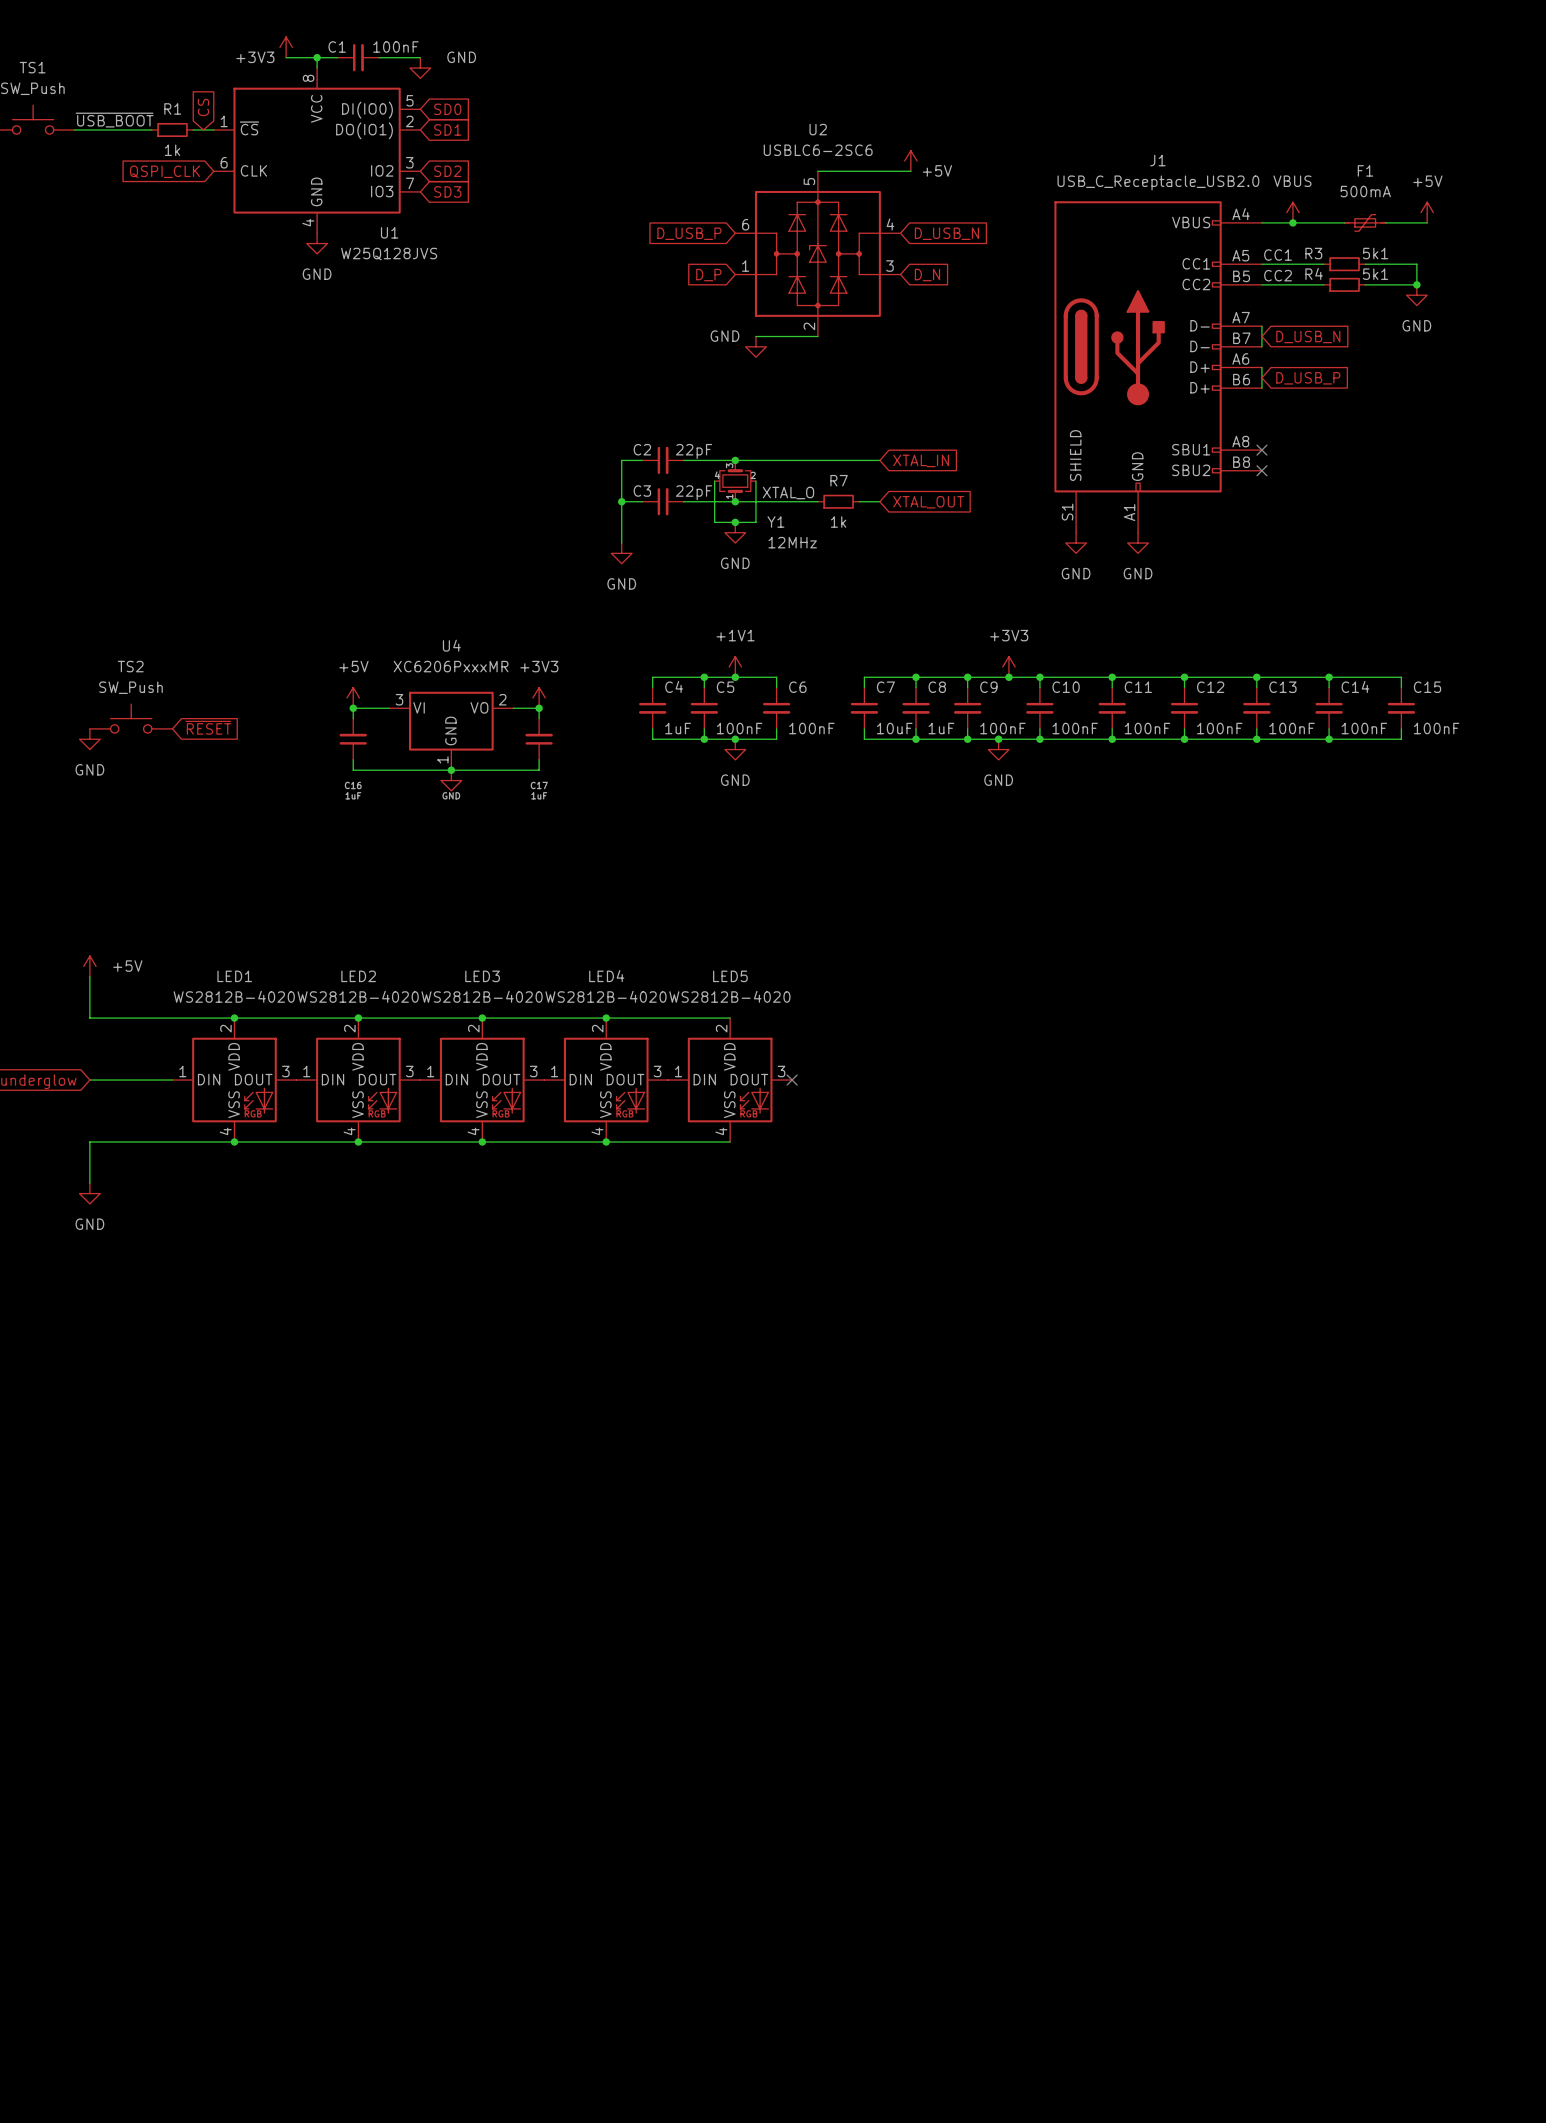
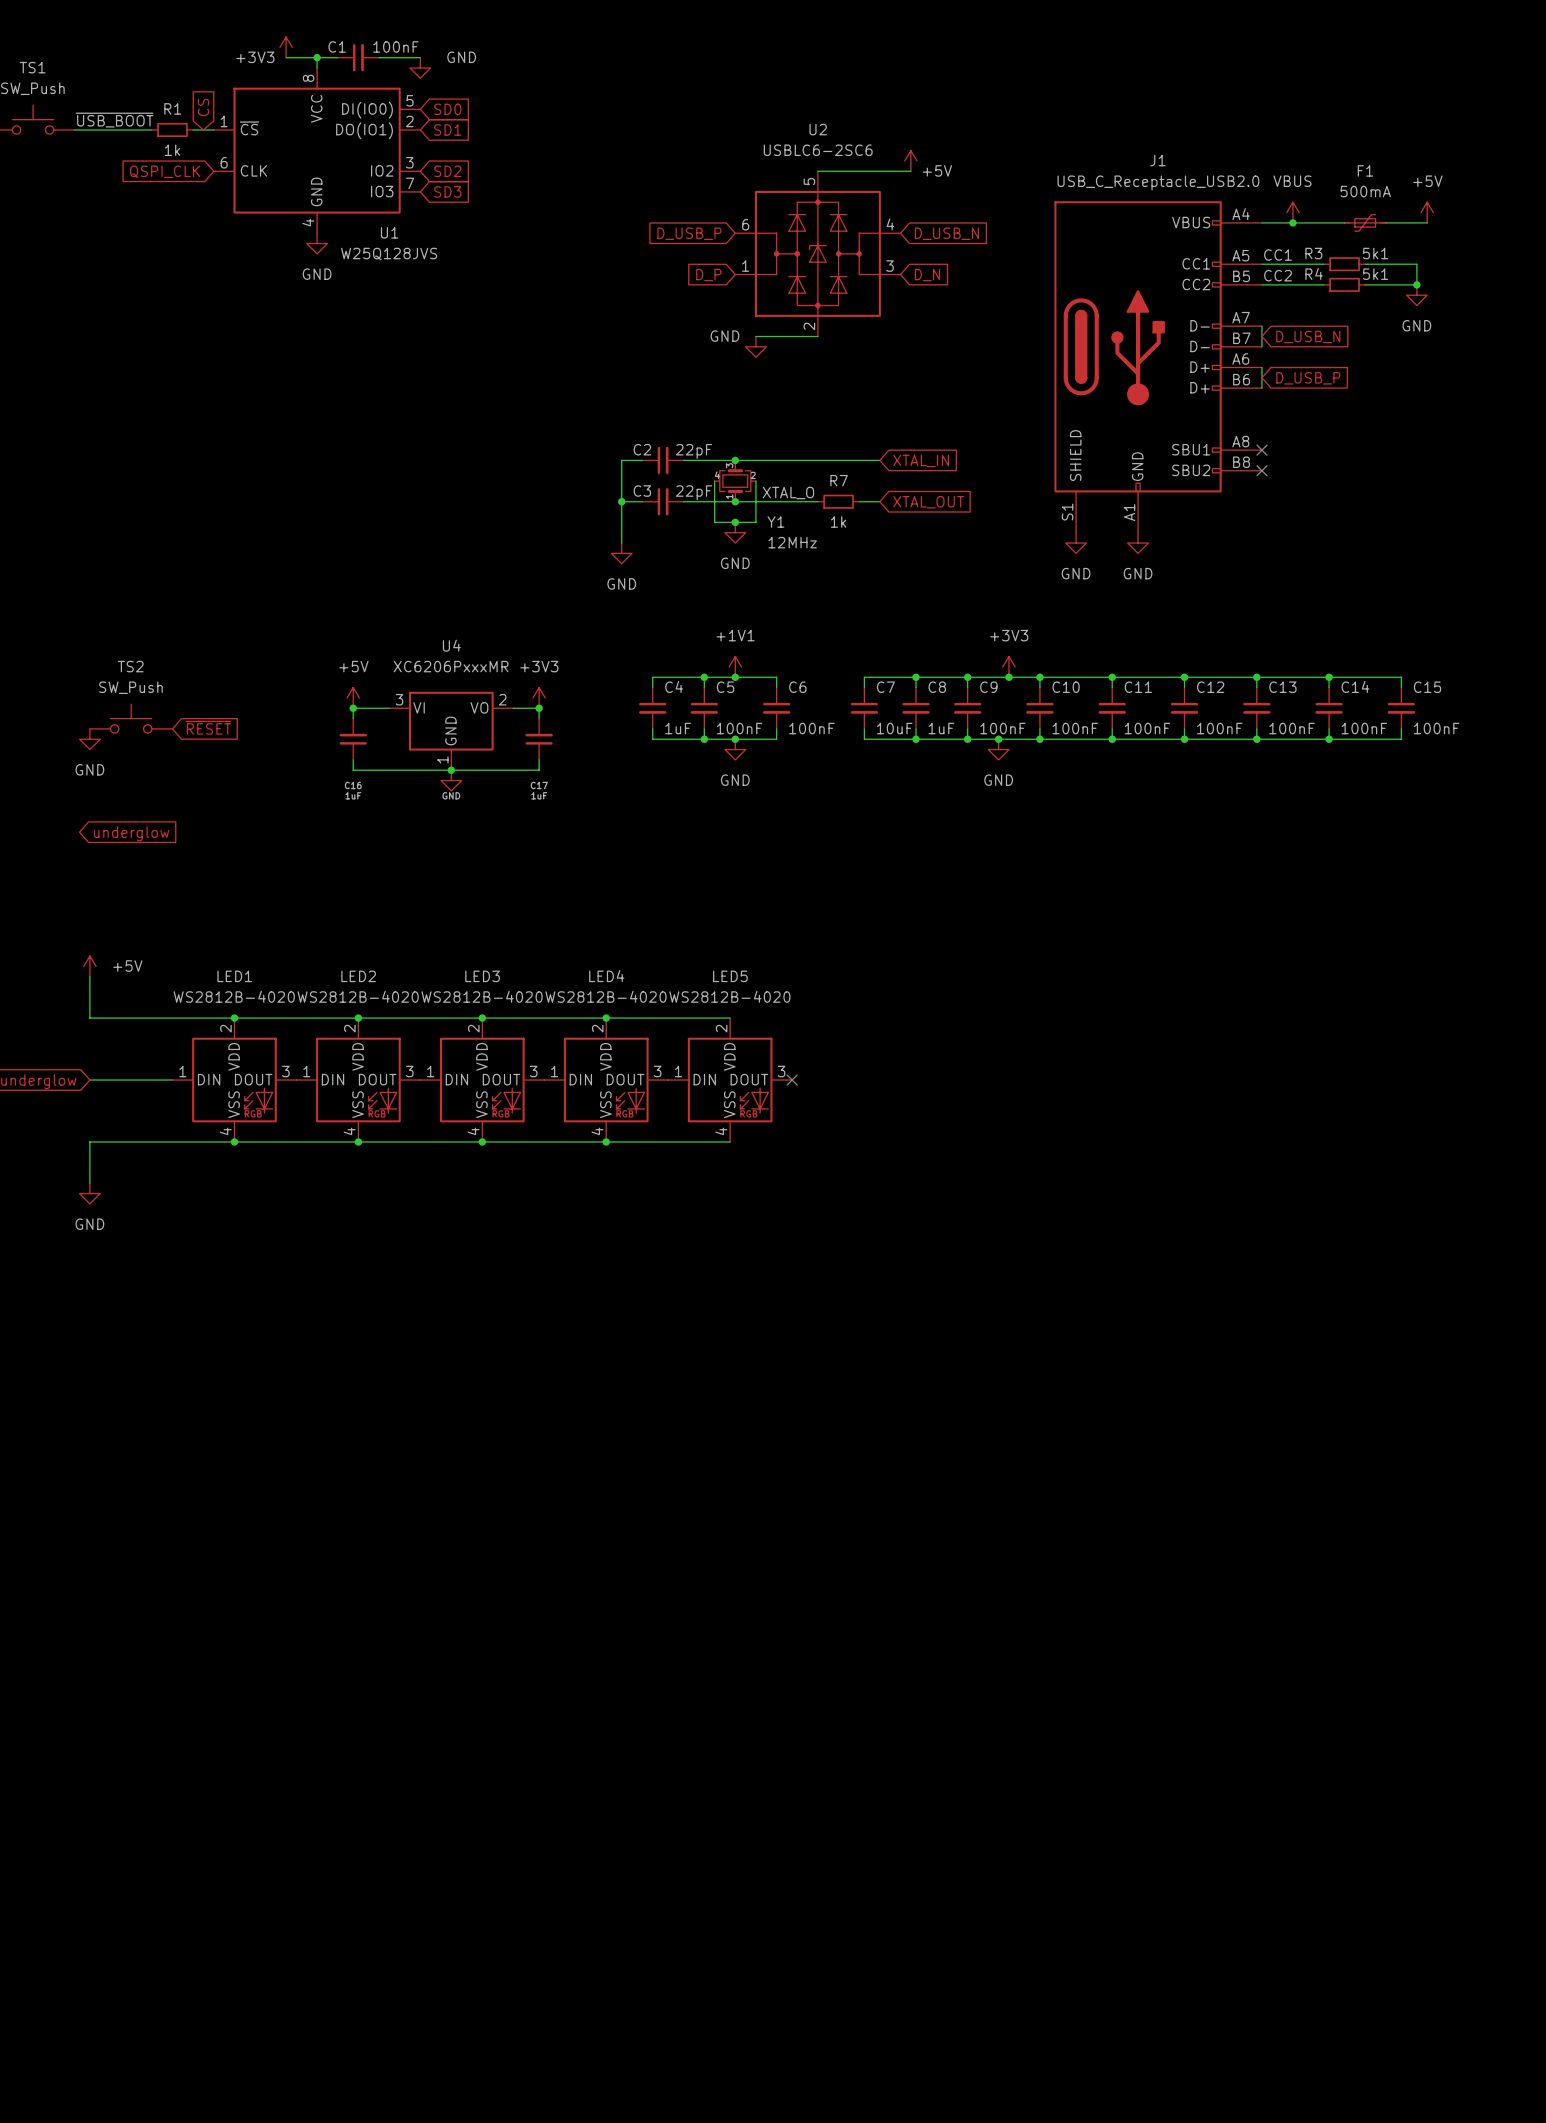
global label: none -> underglow (131, 833)

